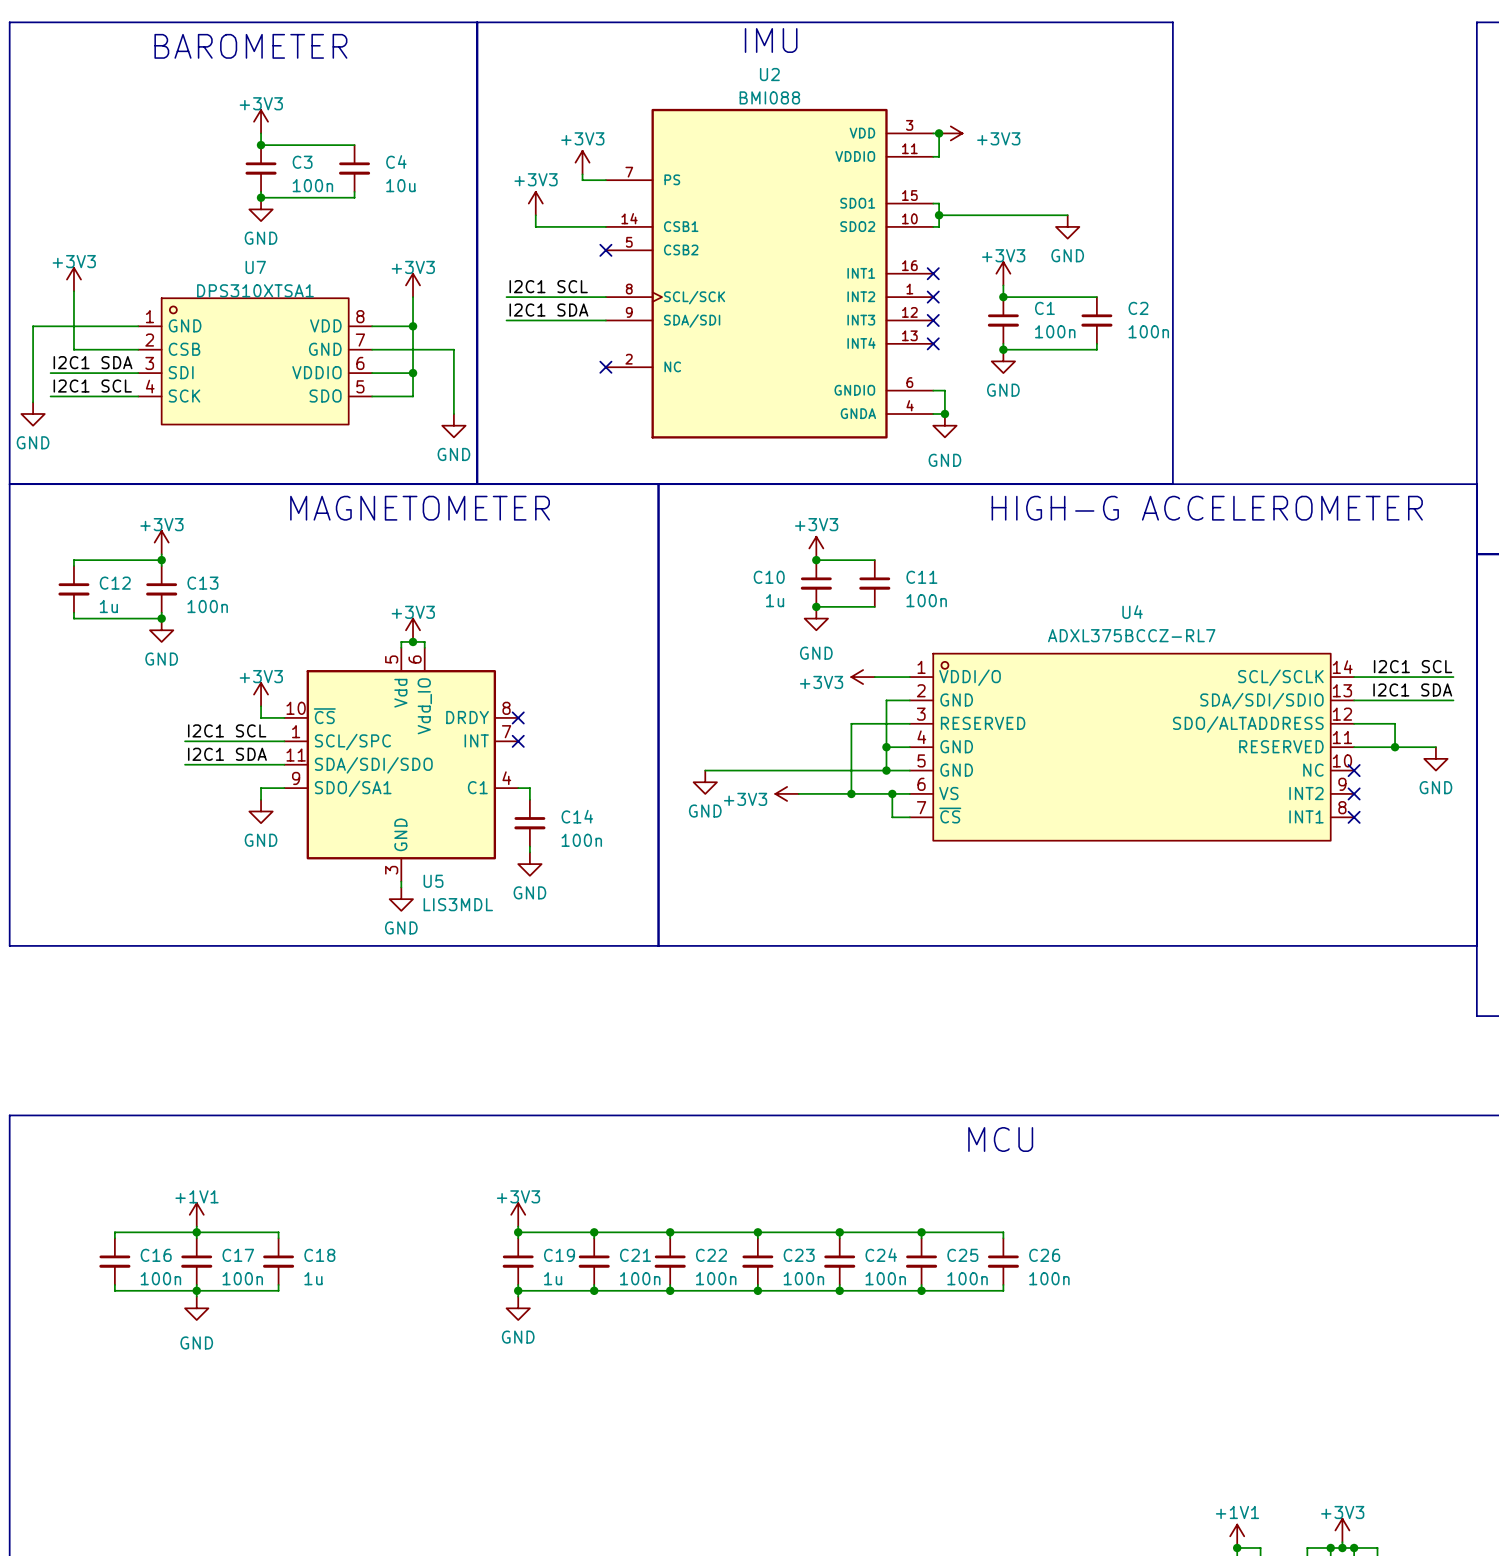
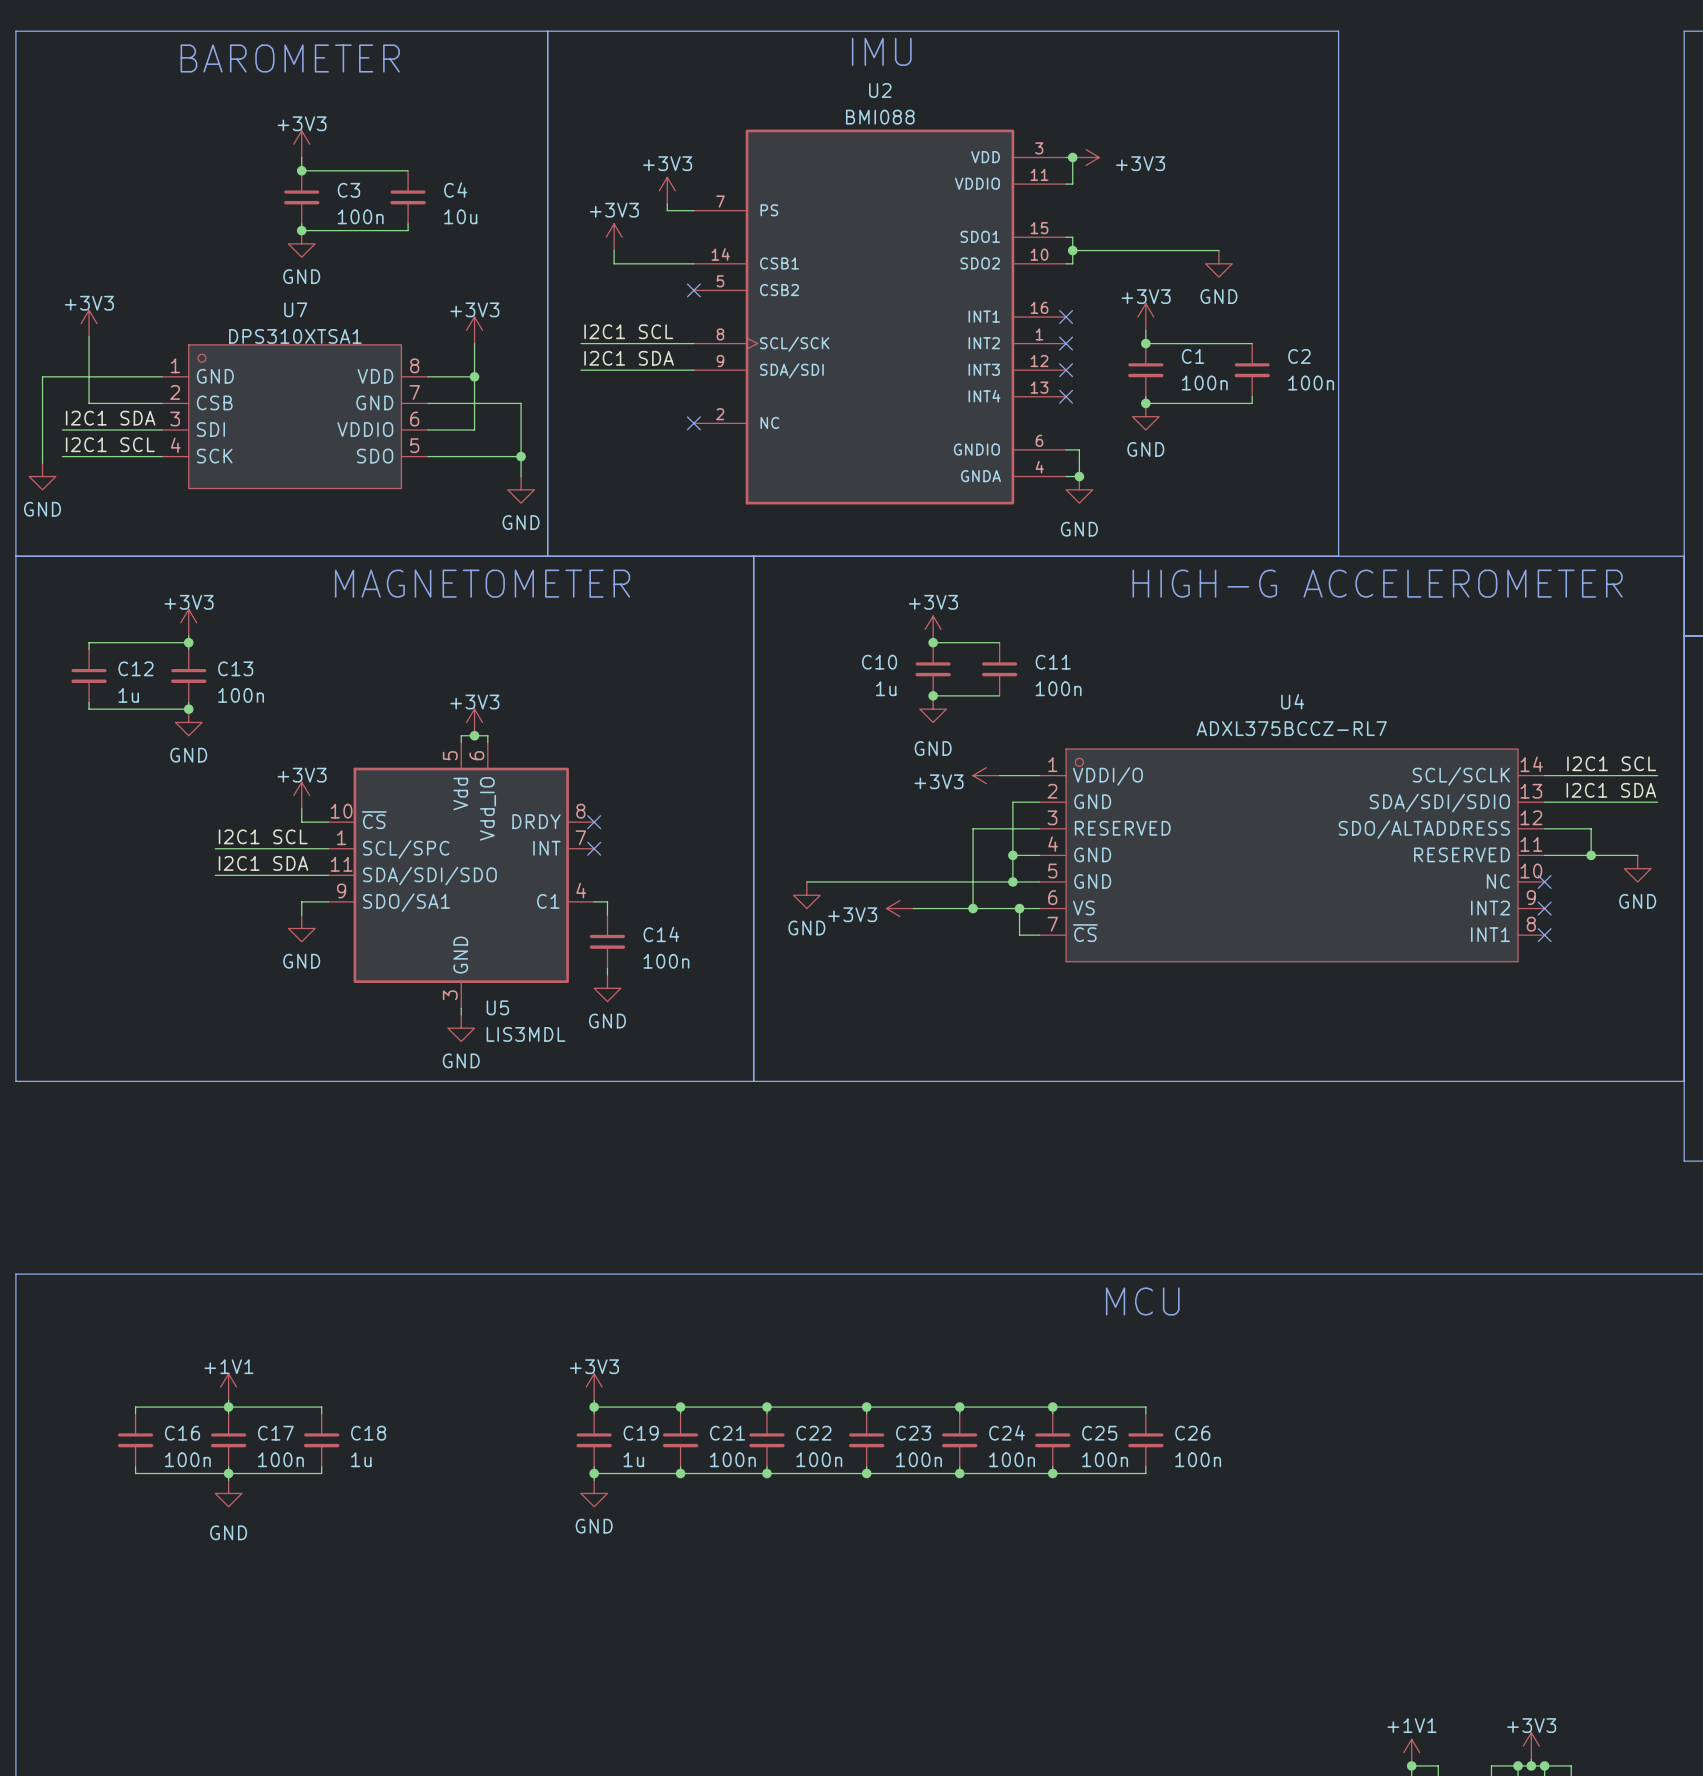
wire: (413, 373) (413, 396) -> (521, 456) (474, 456)
junction position: (413, 373) -> (521, 456)

